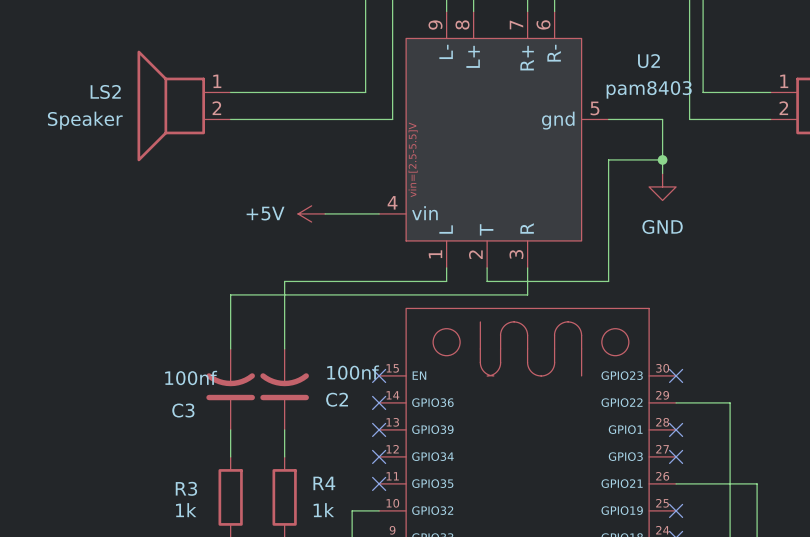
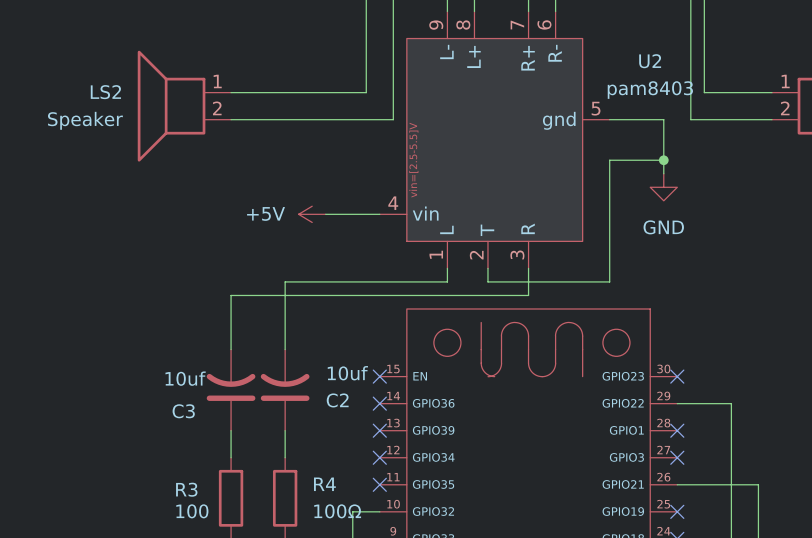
C2 value: 100nf (353, 372) -> 10uf (347, 373)
C3 value: 100nf (191, 377) -> 10uf (185, 378)
R3 value: 1k (186, 510) -> 100 (192, 511)
R4 value: 1k (323, 510) -> 100Ω (337, 511)

